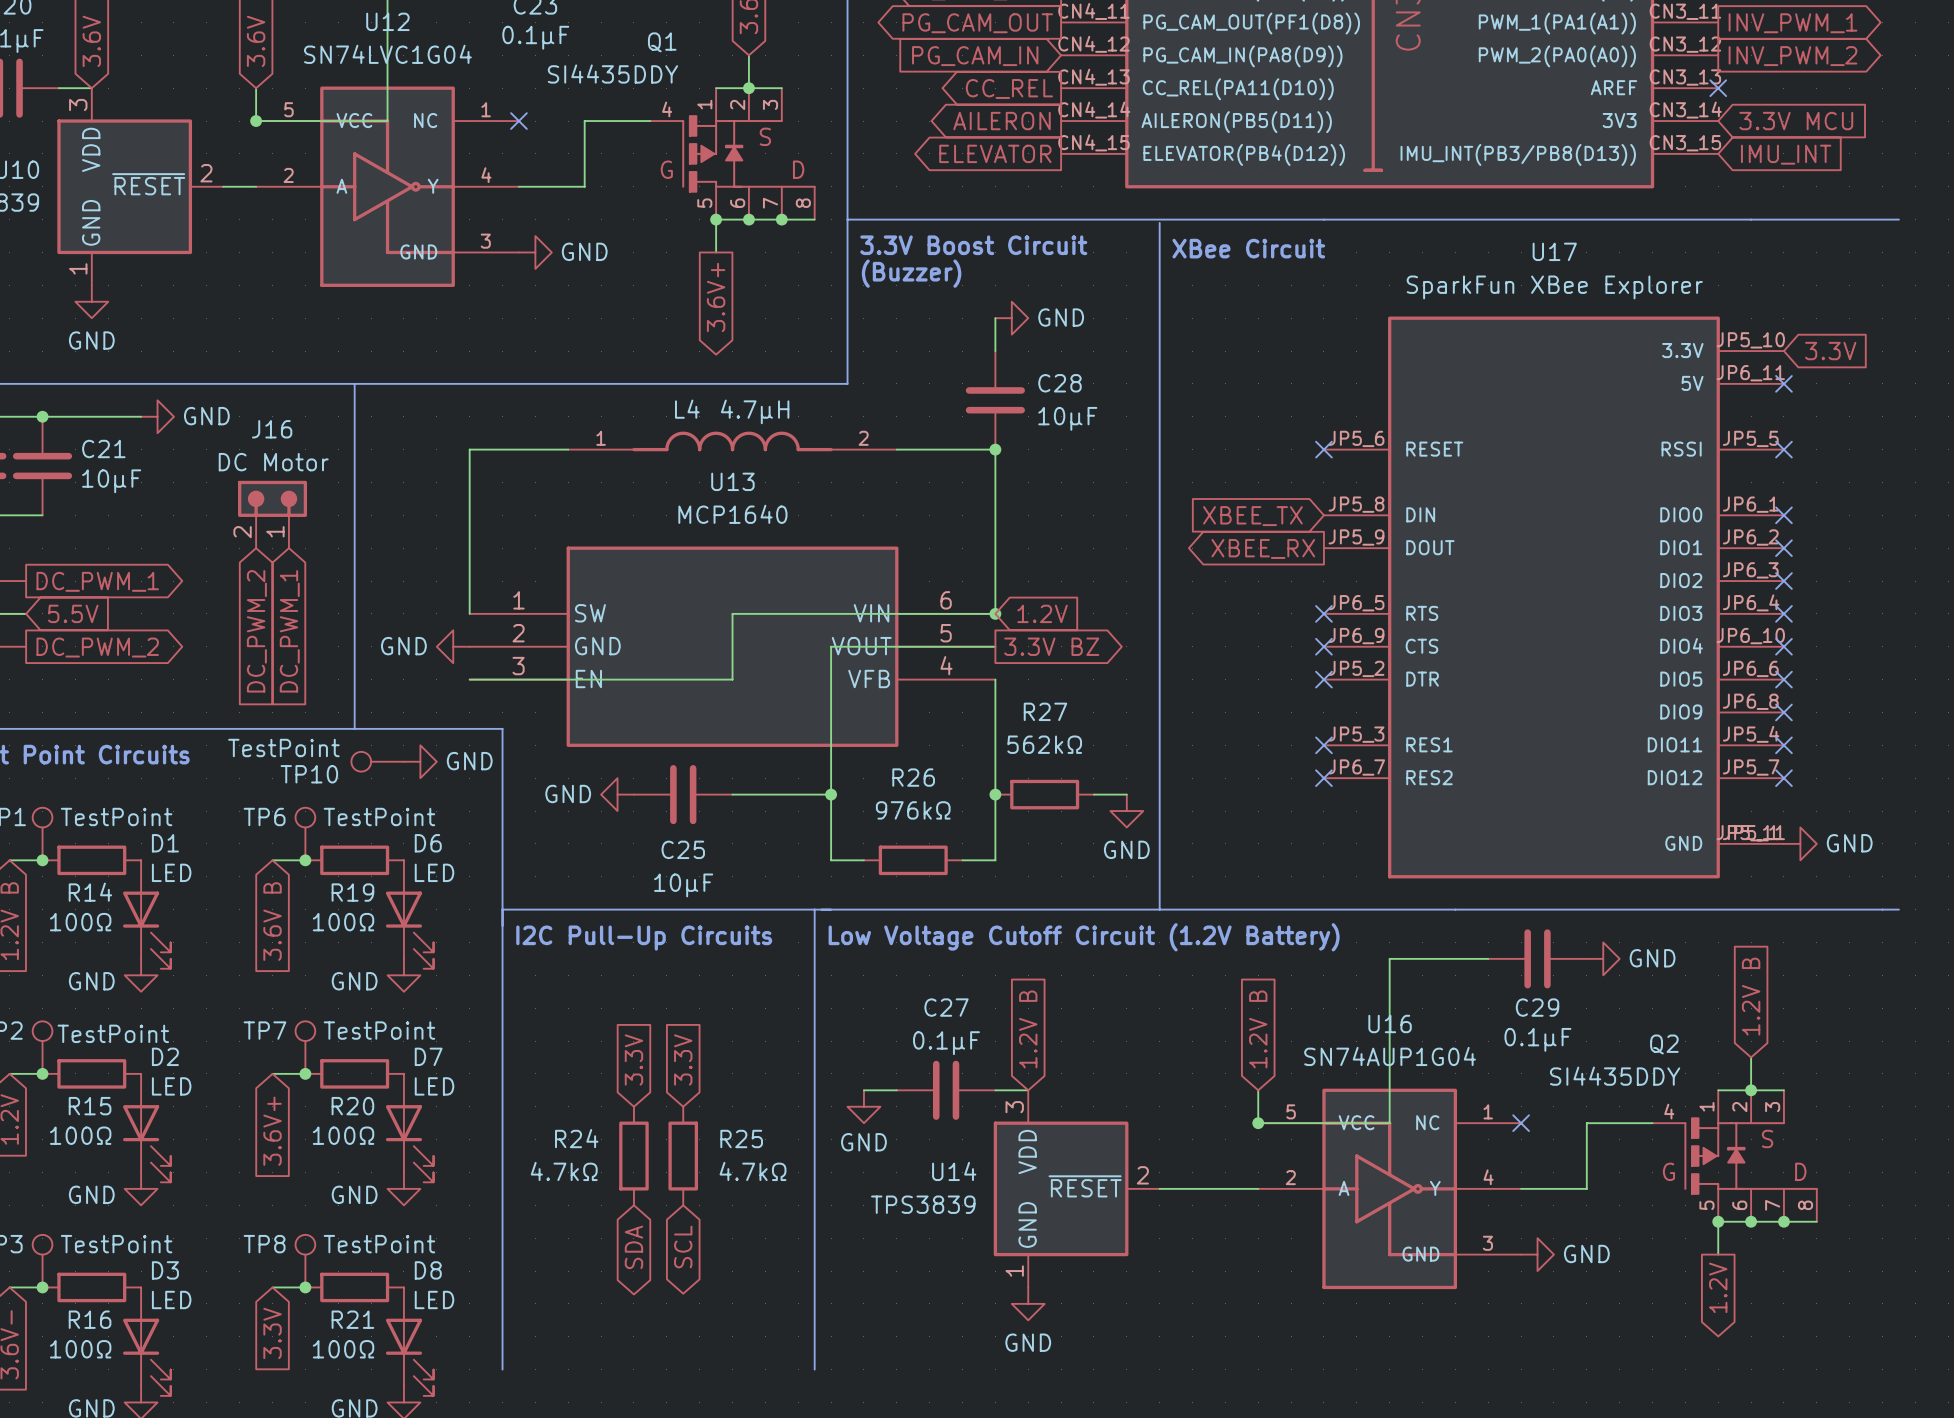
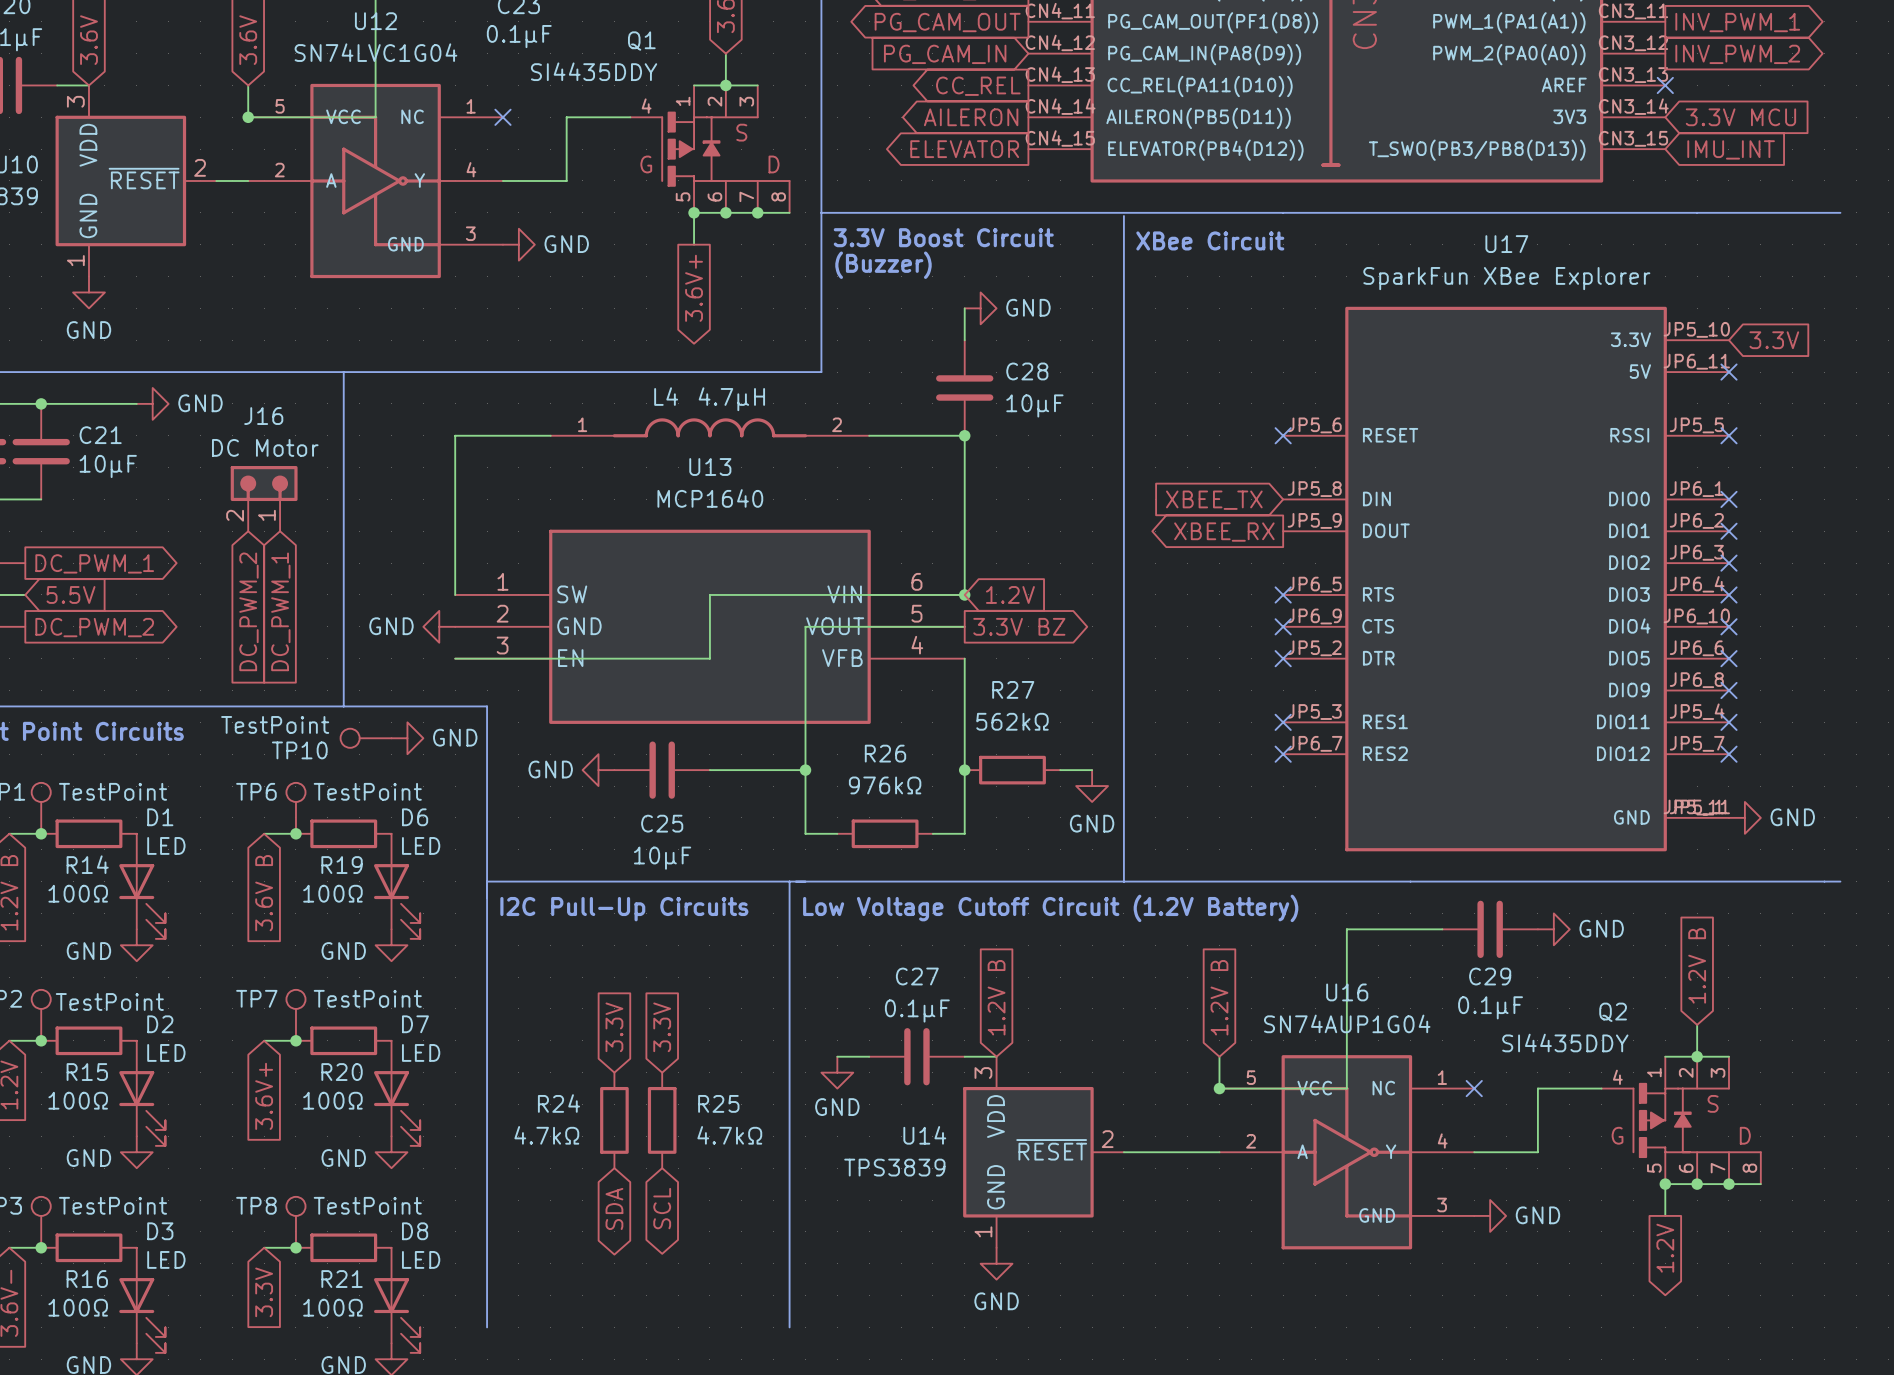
part pin name: IMU_INT(PB3/PB8(D13)) (1518, 154) -> T_SWO(PB3/PB8(D13)) (1477, 150)

